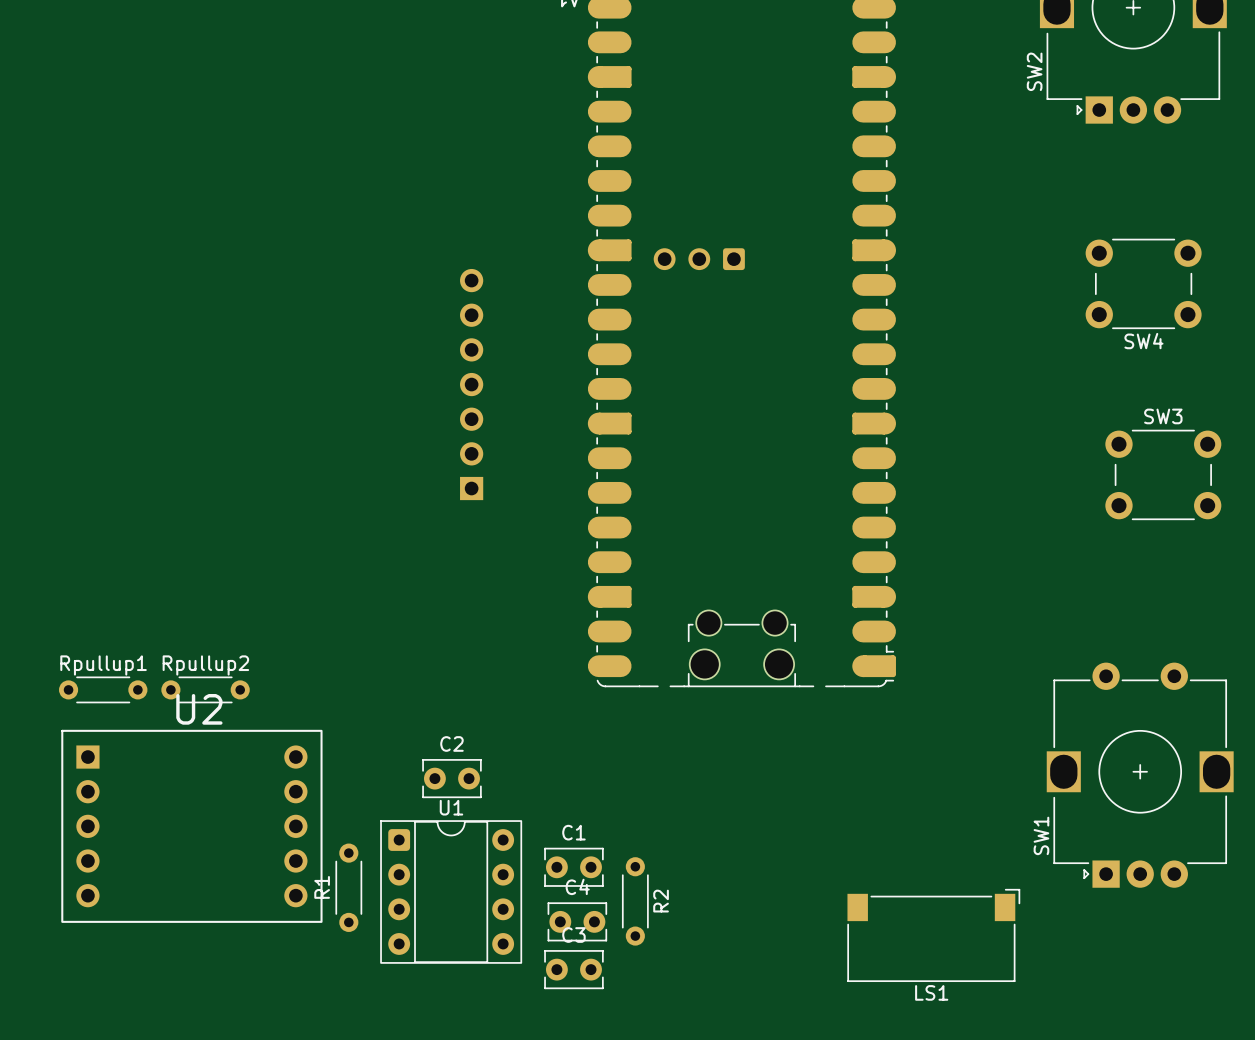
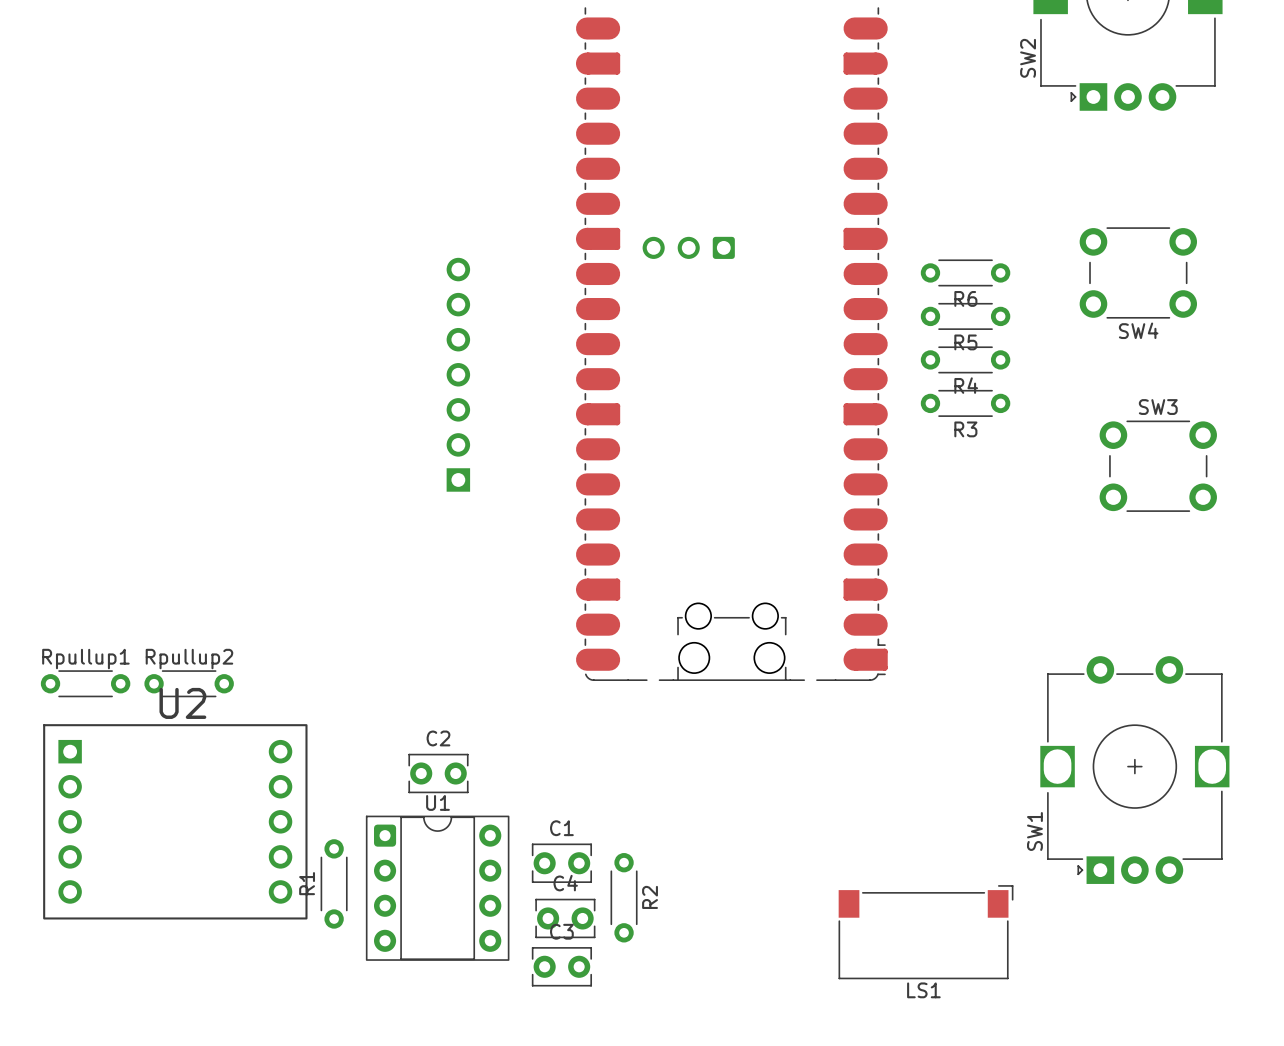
R6: none -> (965, 272)
R5: none -> (965, 316)
R4: none -> (965, 359)
R3: none -> (965, 403)

